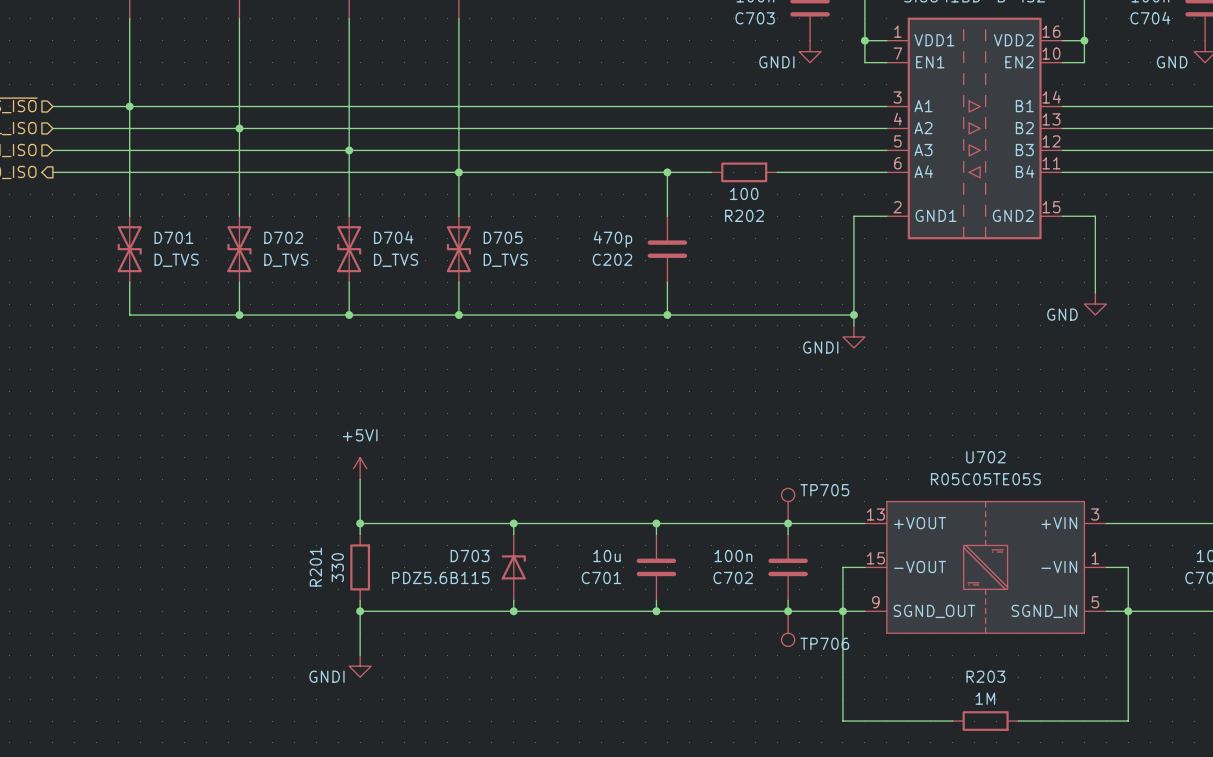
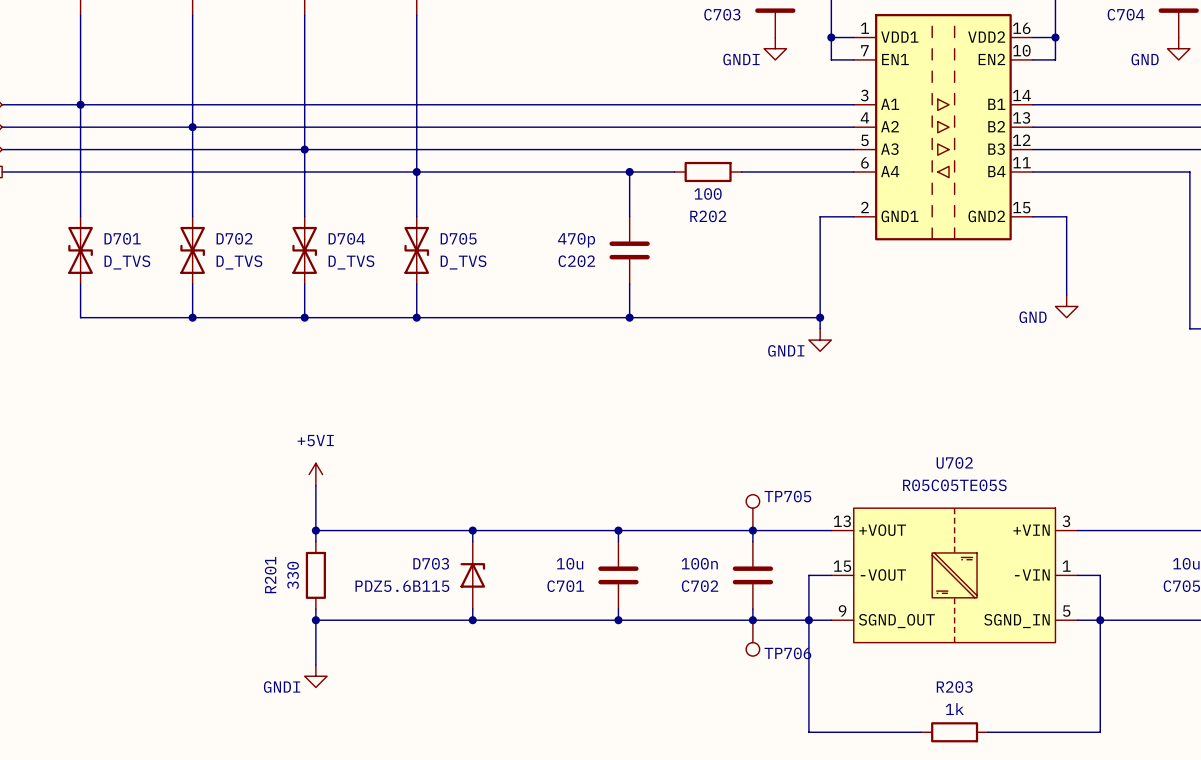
R203 value: 1M (985, 698) -> 1k (954, 709)

